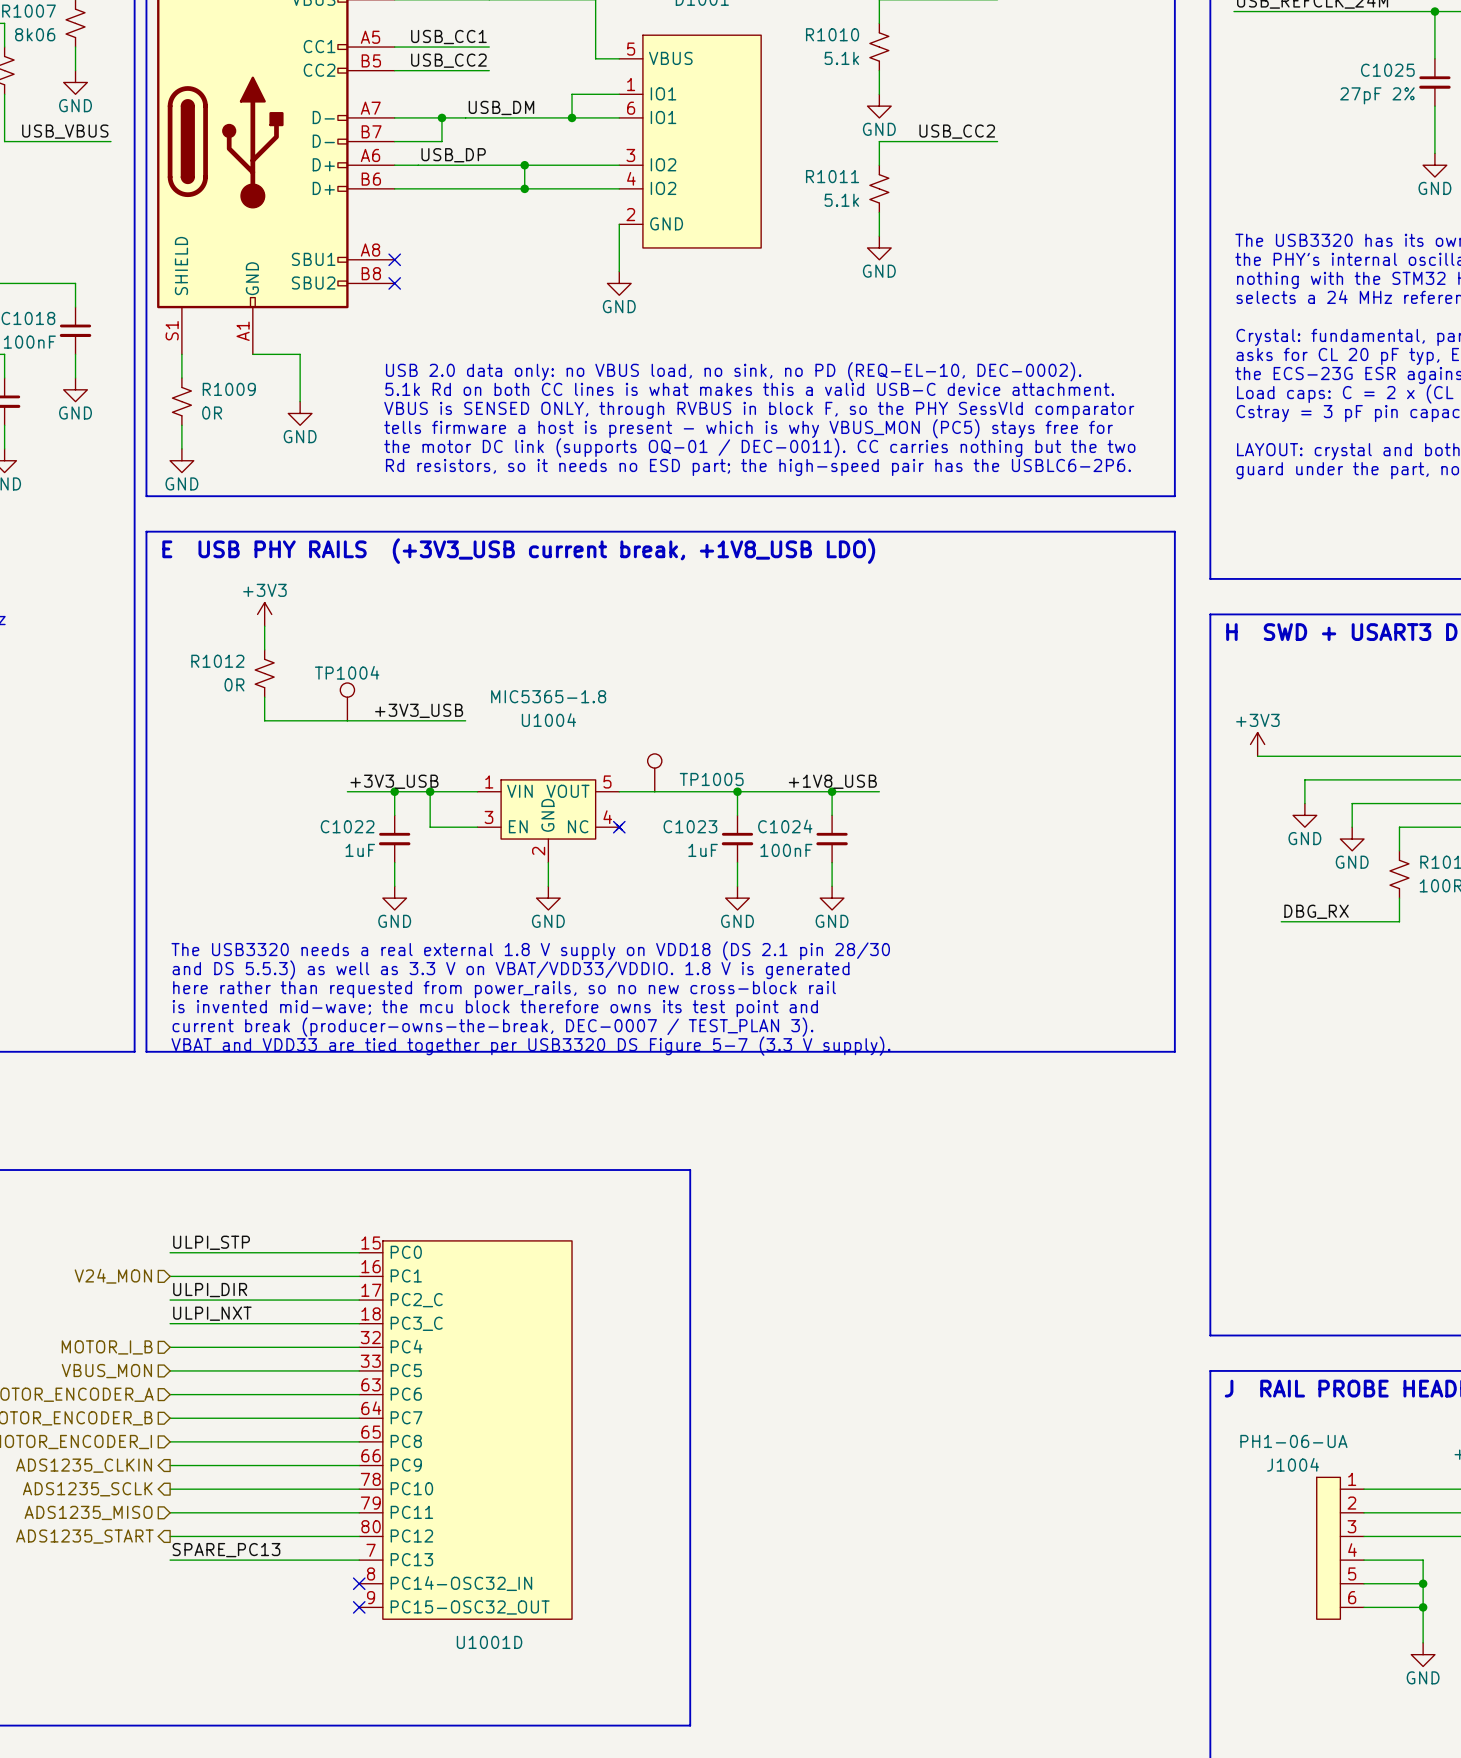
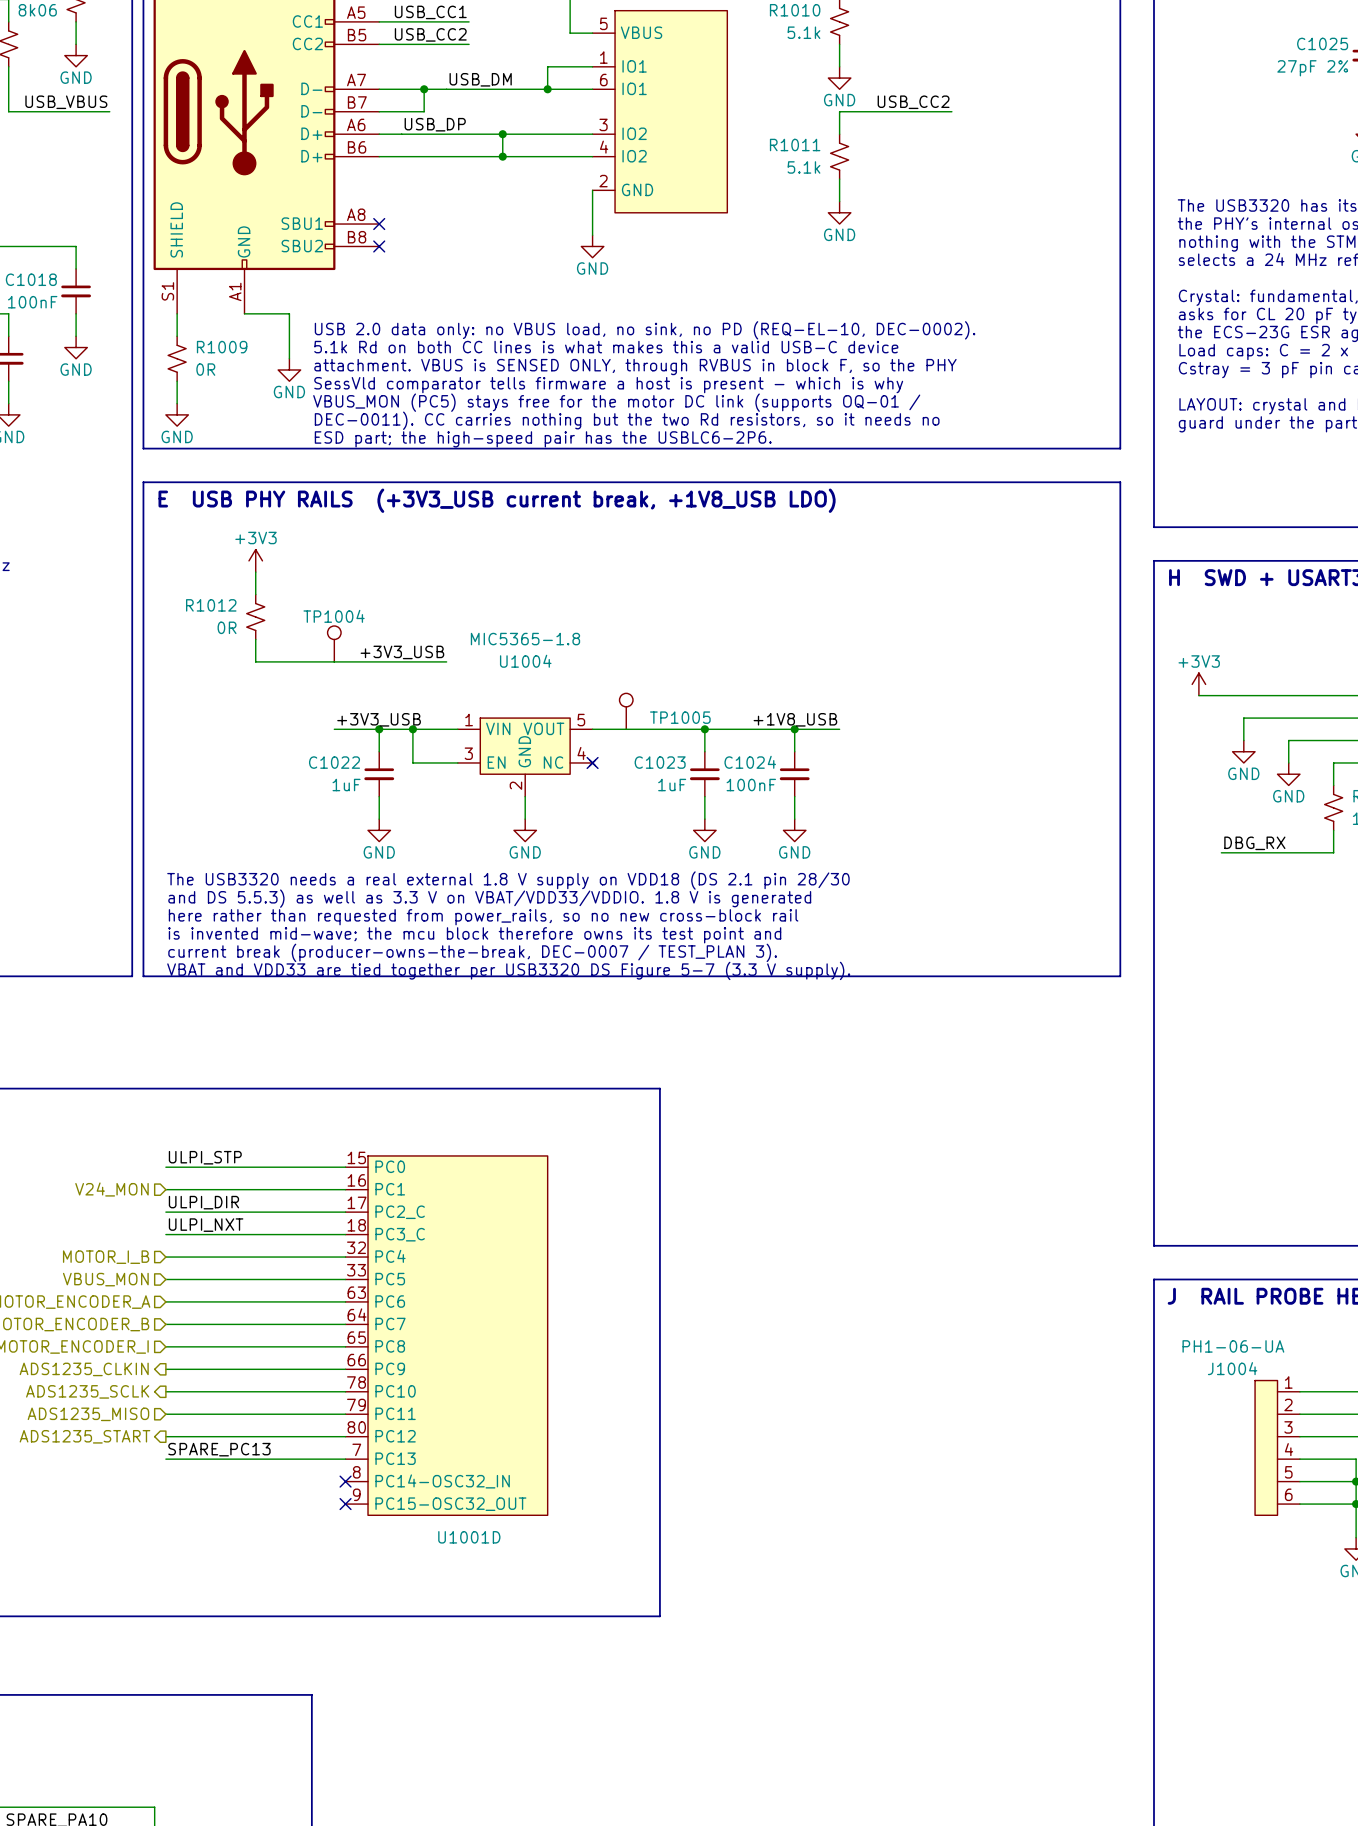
text position: USB 2.0 data only: no VBUS load, no sink, no PD (REQ-EL-10, DEC-0002). (733, 371) -> USB 2.0 data only: no VBUS load, no sink, no PD (REQ-EL-10, DEC-0002). (645, 330)
text: 5.1k Rd on both CC lines is what makes this a valid USB-C device attachment. (749, 389) -> 5.1k Rd on both CC lines is what makes this a valid USB-C device (606, 347)
text: VBUS is SENSED ONLY, through RVBUS in block F, so the PHY SessVld comparator (759, 410) -> attachment. VBUS is SENSED ONLY, through RVBUS in block F, so the PHY (635, 367)
text: tells firmware a host is present - which is why VBUS_MON (PC5) stays free for (748, 428) -> SessVld comparator tells firmware a host is present - which is why (608, 385)
text: none -> VBUS_MON (PC5) stays free for the motor DC link (supports OQ-01 / (616, 402)
text: the motor DC link (supports OQ-01 / DEC-0011). CC carries nothing but the two (759, 447) -> none
text: none -> DEC-0011). CC carries nothing but the two Rd resistors, so it needs no (627, 420)
text: Rd resistors, so it needs no ESD part; the high-speed pair has the USBLC6-2P6. (758, 467) -> ESD part; the high-speed pair has the USBLC6-2P6. (543, 439)

